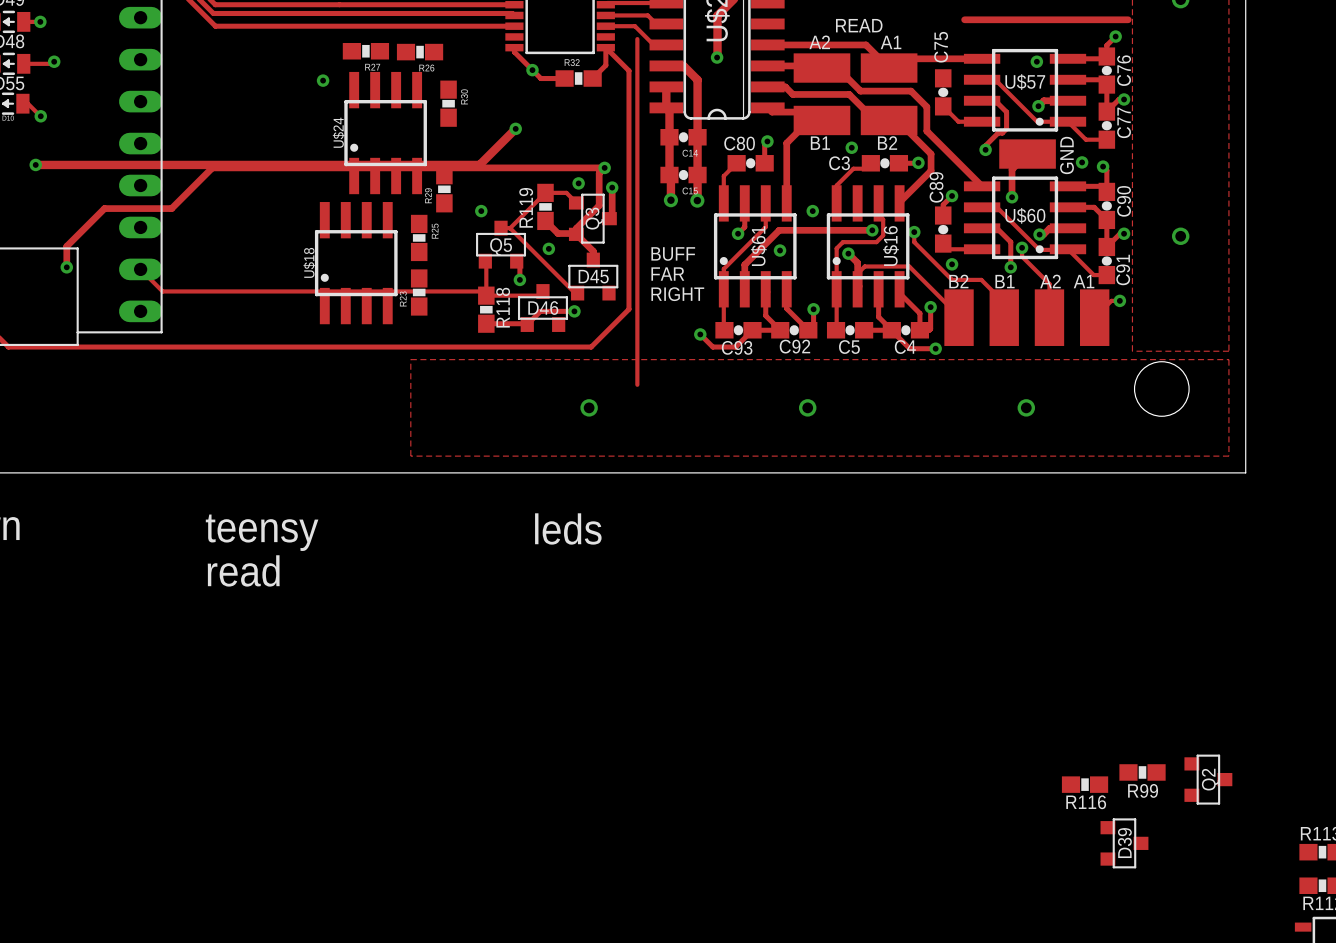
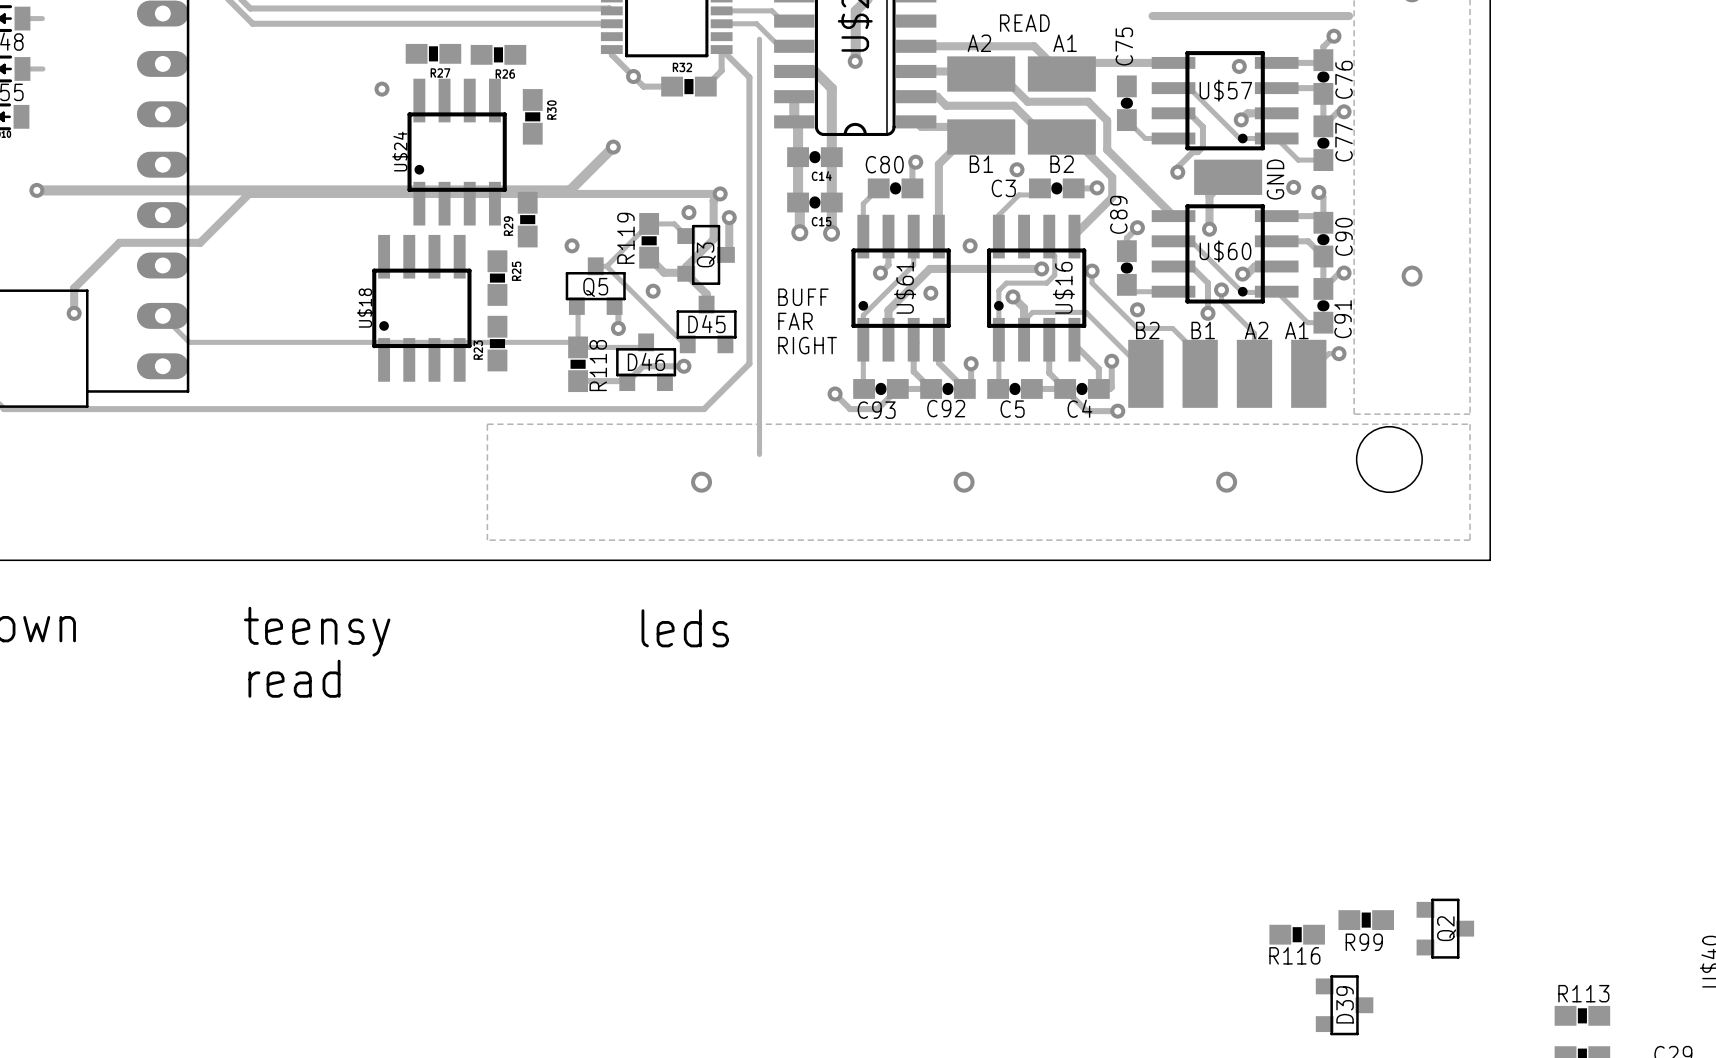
via: (40, 21) -> none
track: (54, 61) (52, 63) (40, 63) -> none
via: (54, 61) -> none
track: (22, 103) (27, 103) (40, 116) -> none
via: (40, 116) -> none

